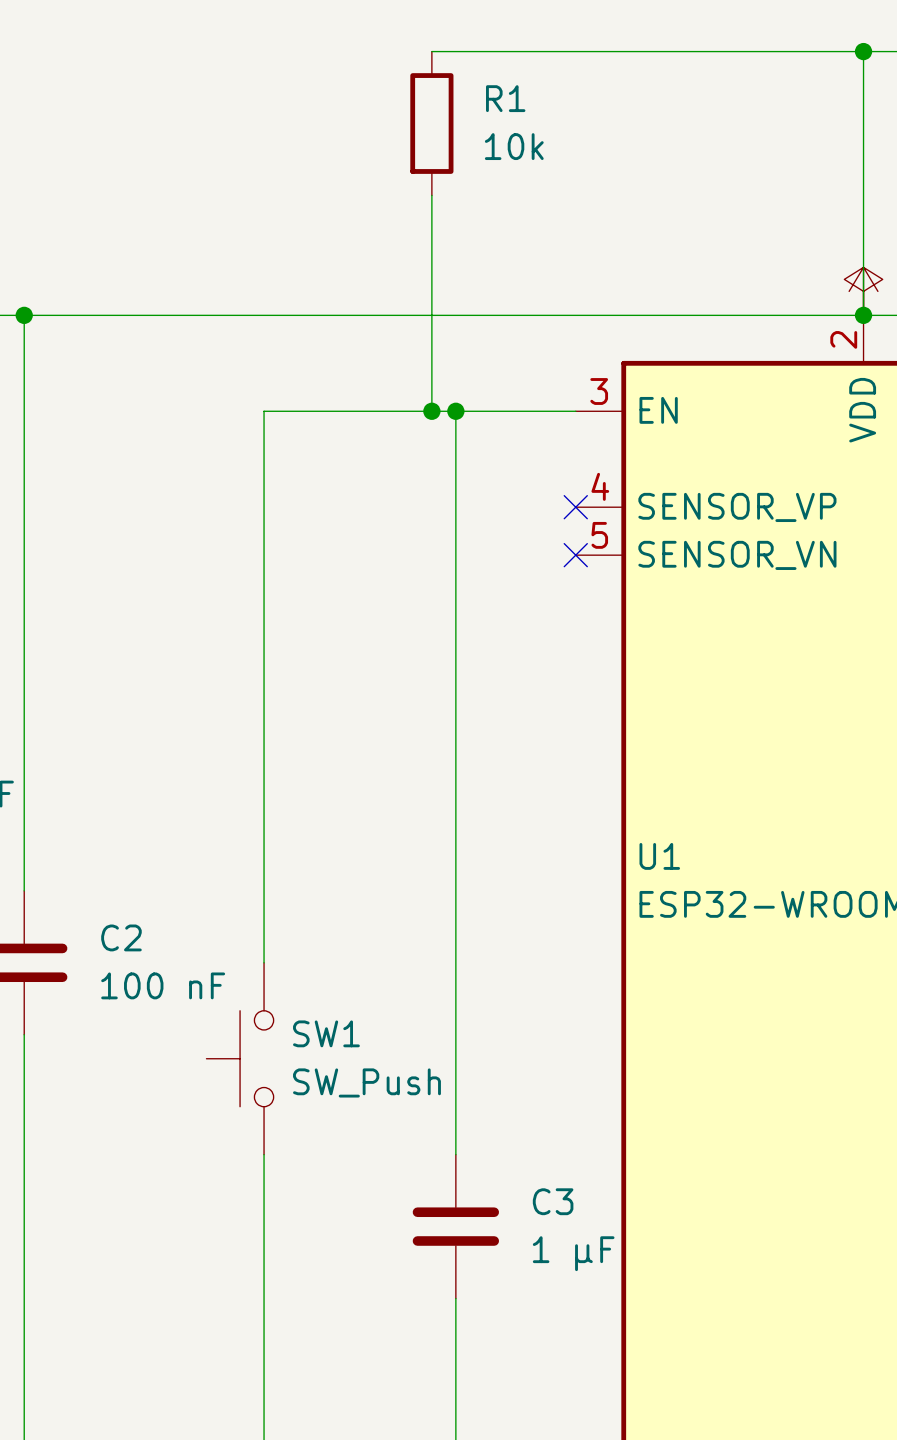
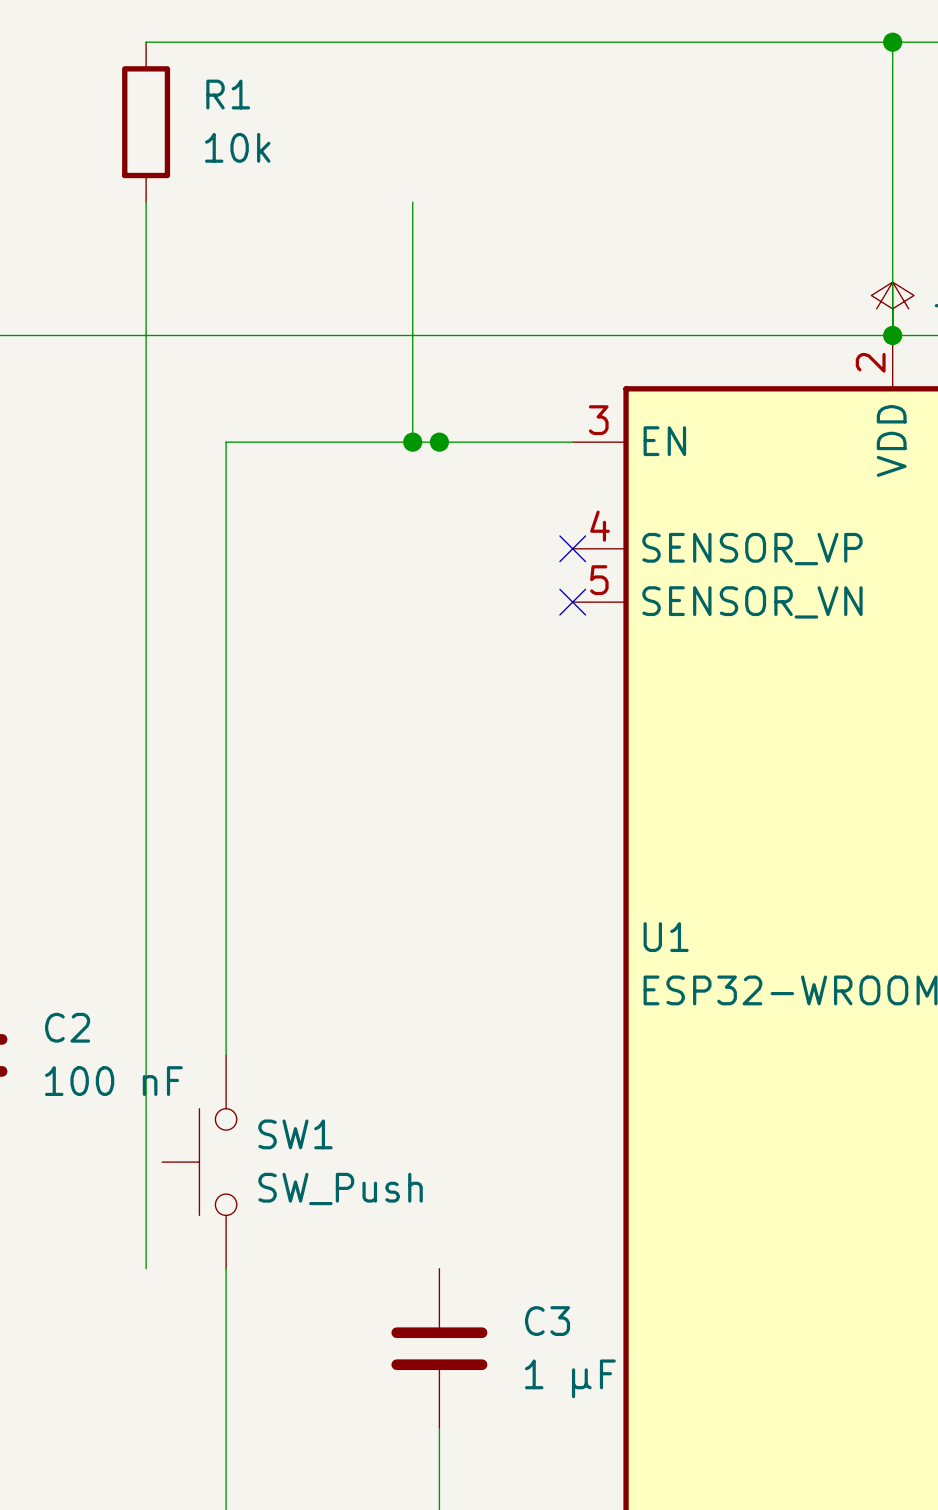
wire: none -> (146, 42) (412, 42)
R1 position: (431, 123) -> (146, 122)
wire: none -> (146, 202) (146, 1268)
wire: (455, 411) (455, 1154) -> none

